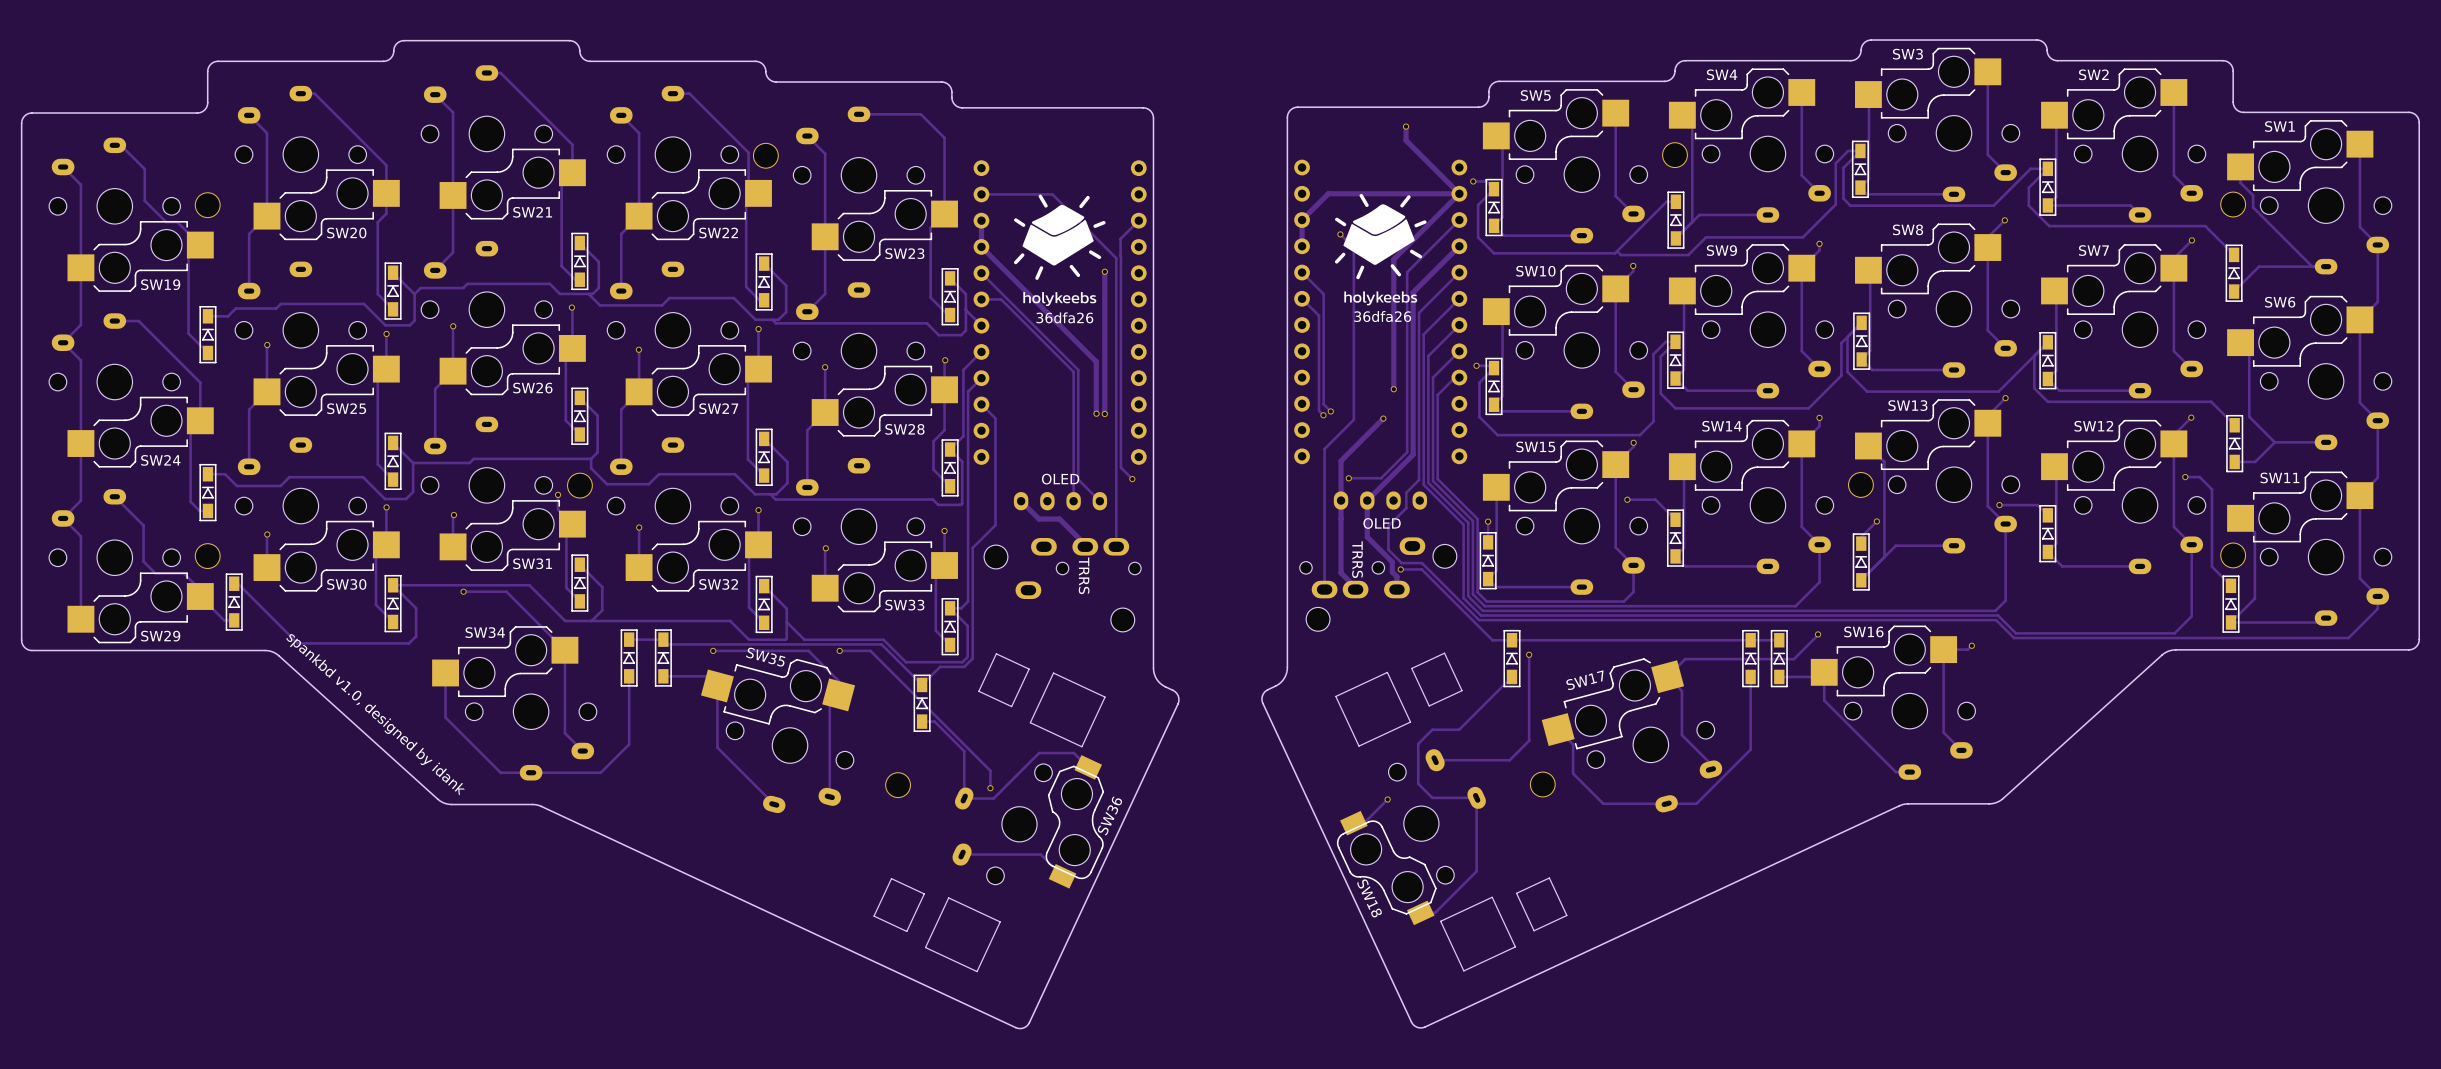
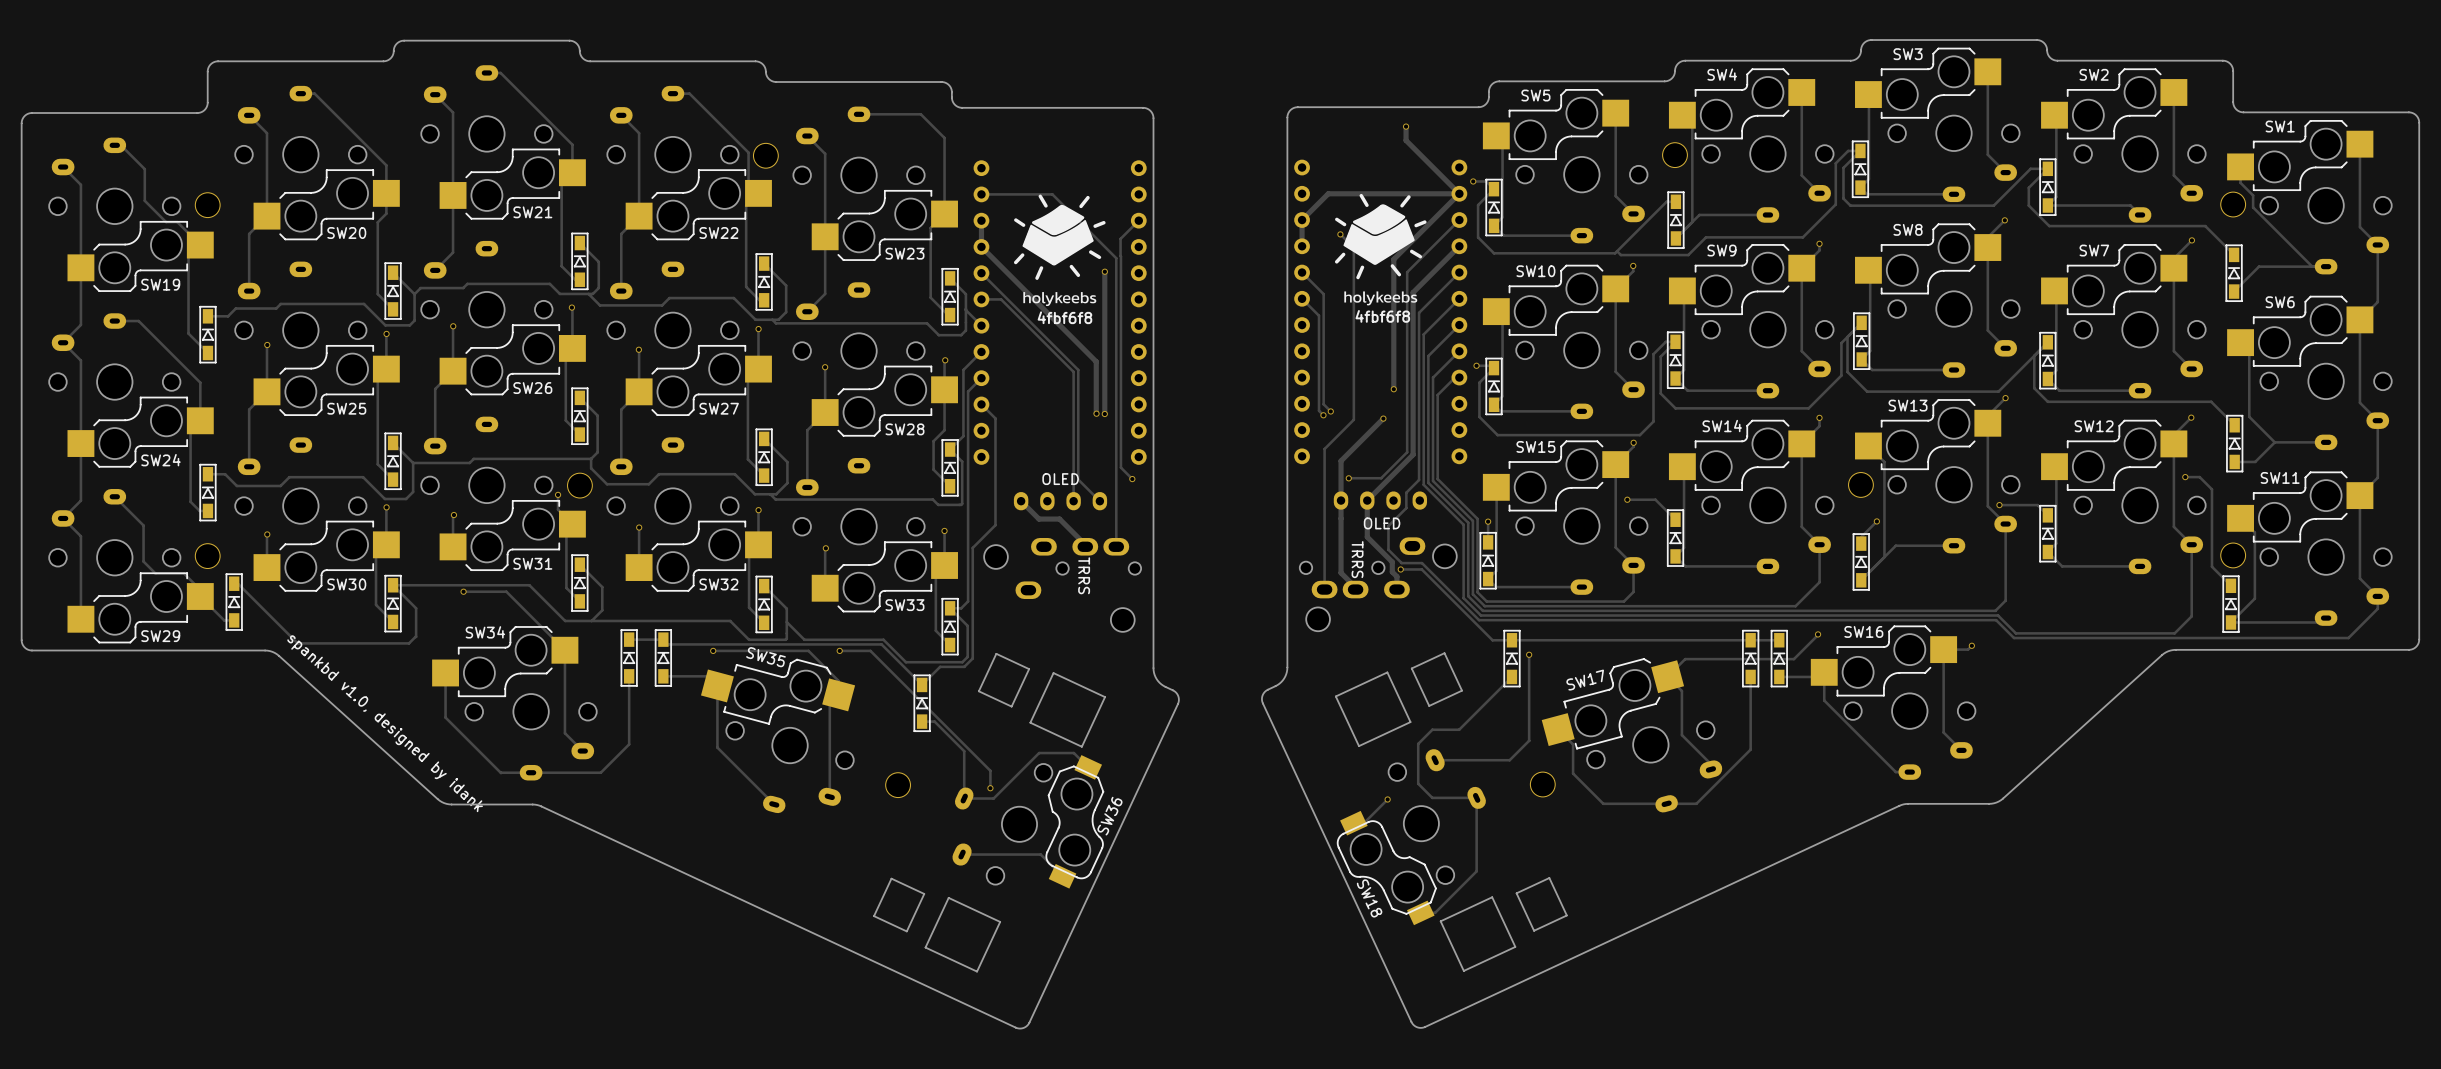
text: 36dfa26 (1382, 316) -> 4fbf6f8 (1382, 316)
text: 36dfa26 (1064, 317) -> 4fbf6f8 (1064, 317)

